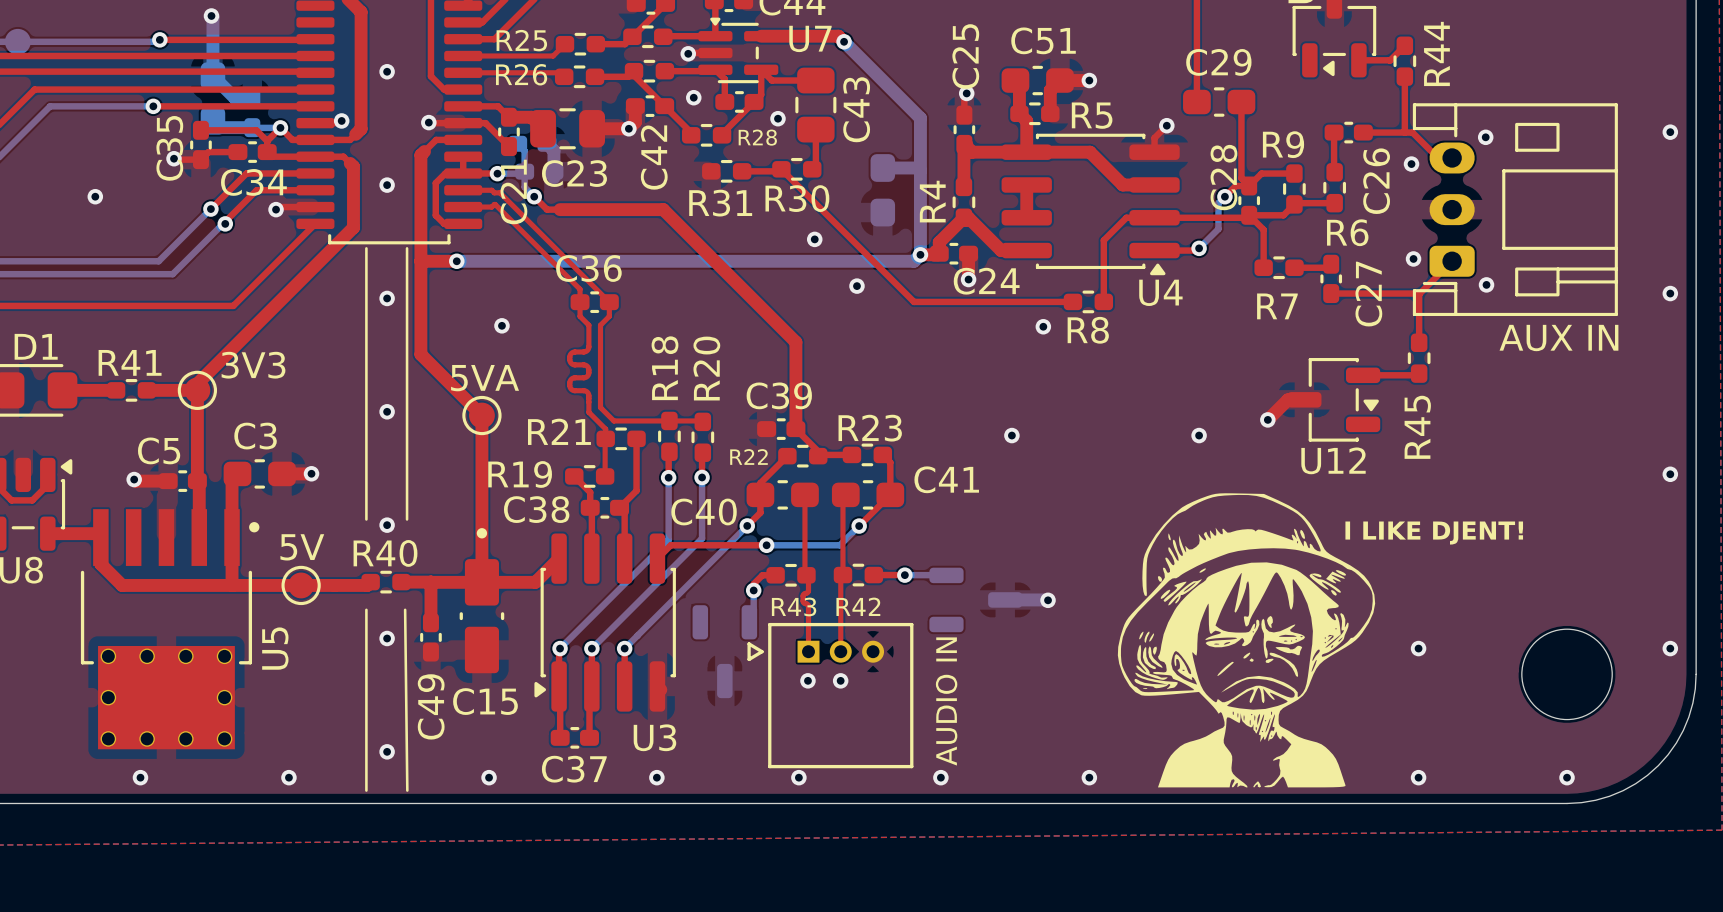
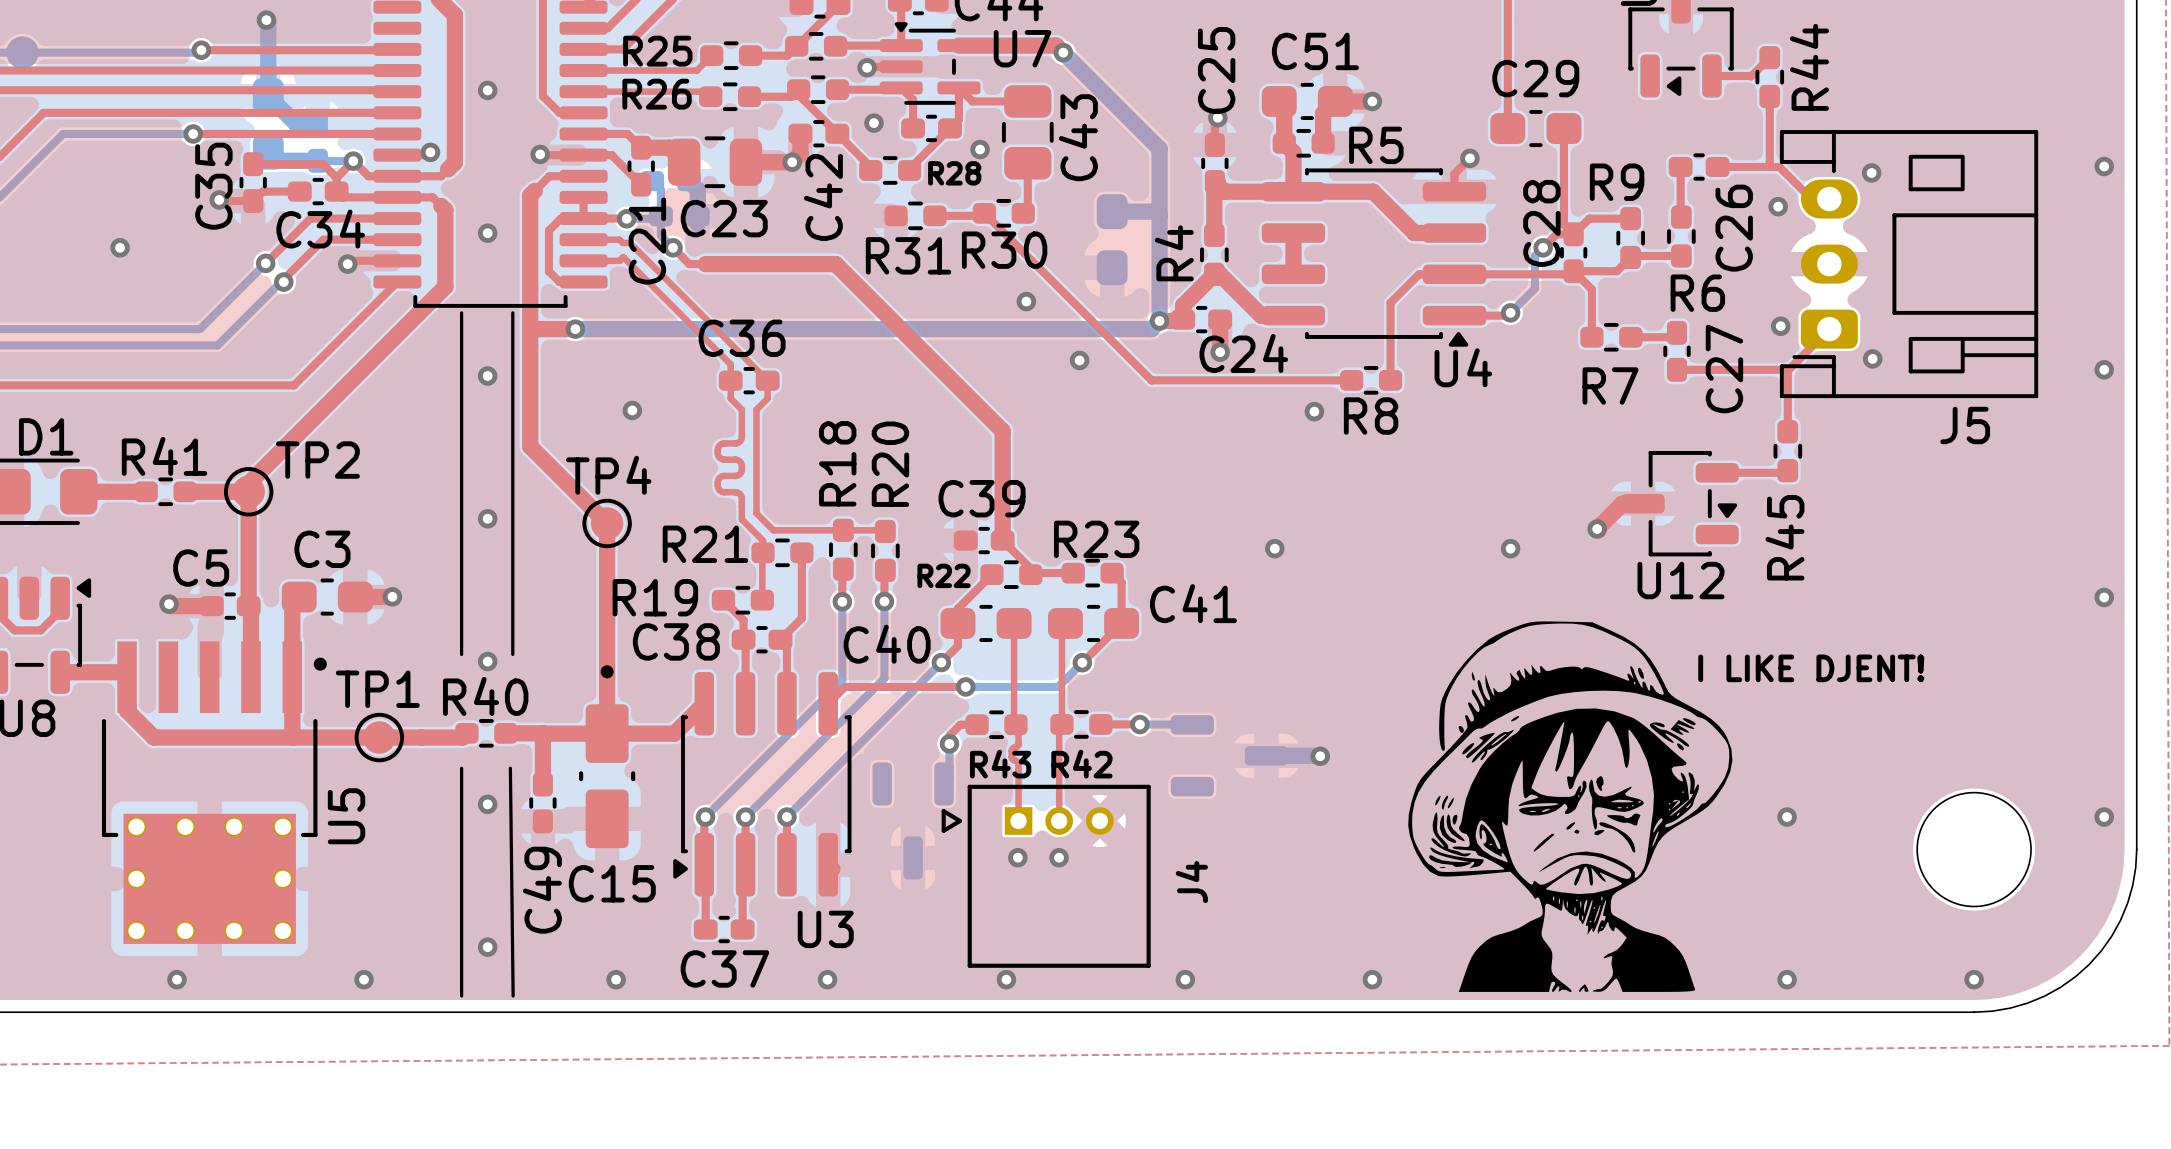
AUX IN name: AUX IN (1558, 338) -> J5 (1965, 425)
3V3 name: 3V3 (253, 365) -> TP2 (317, 460)
5VA name: 5VA (485, 378) -> TP4 (608, 475)
5V name: 5V (302, 547) -> TP1 (377, 689)
AUDIO IN name: AUDIO IN (946, 701) -> J4 (1191, 882)

